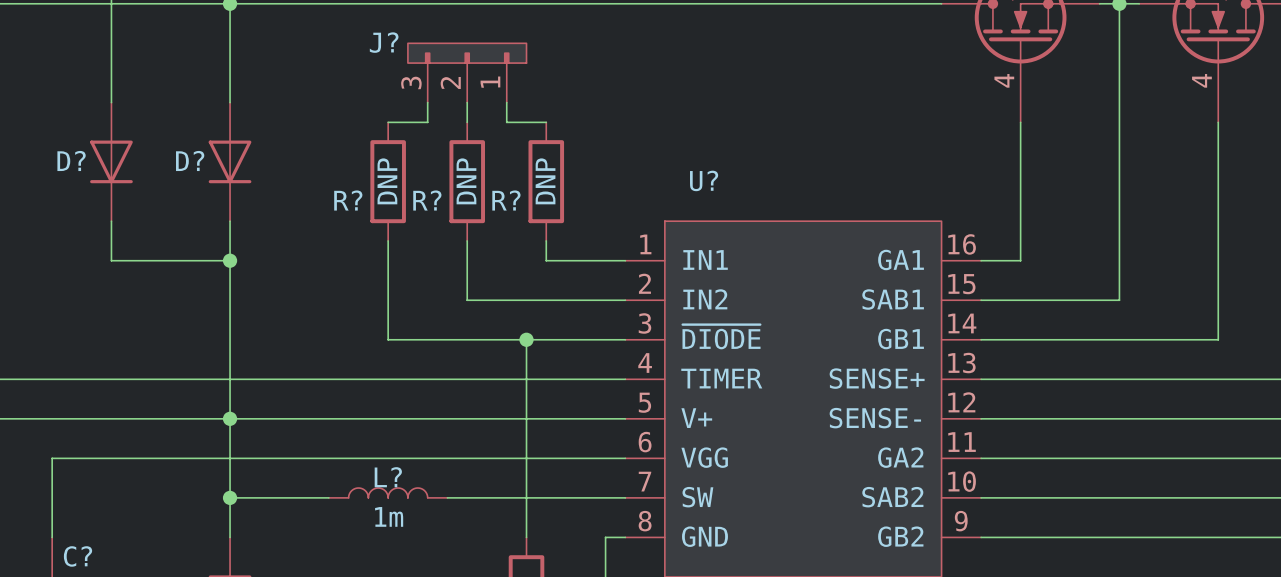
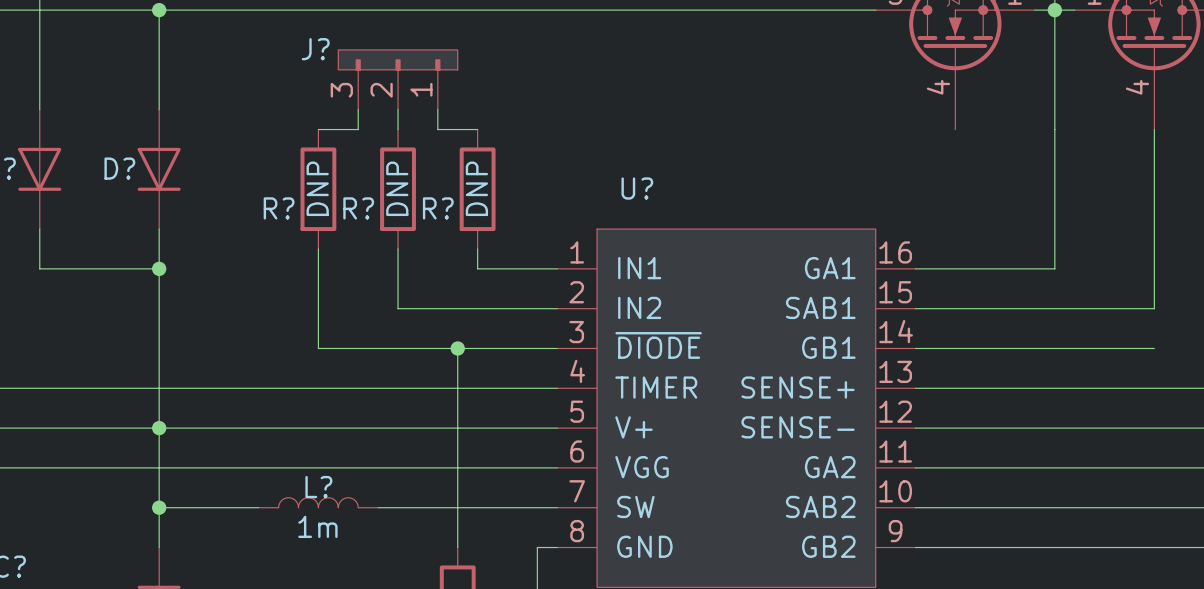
wire: (1020, 122) (1020, 260) -> none
wire: (1119, 260) (1119, 300) -> (1054, 268) (955, 268)
wire: (1218, 300) (1218, 339) -> (1154, 308) (1054, 308)

